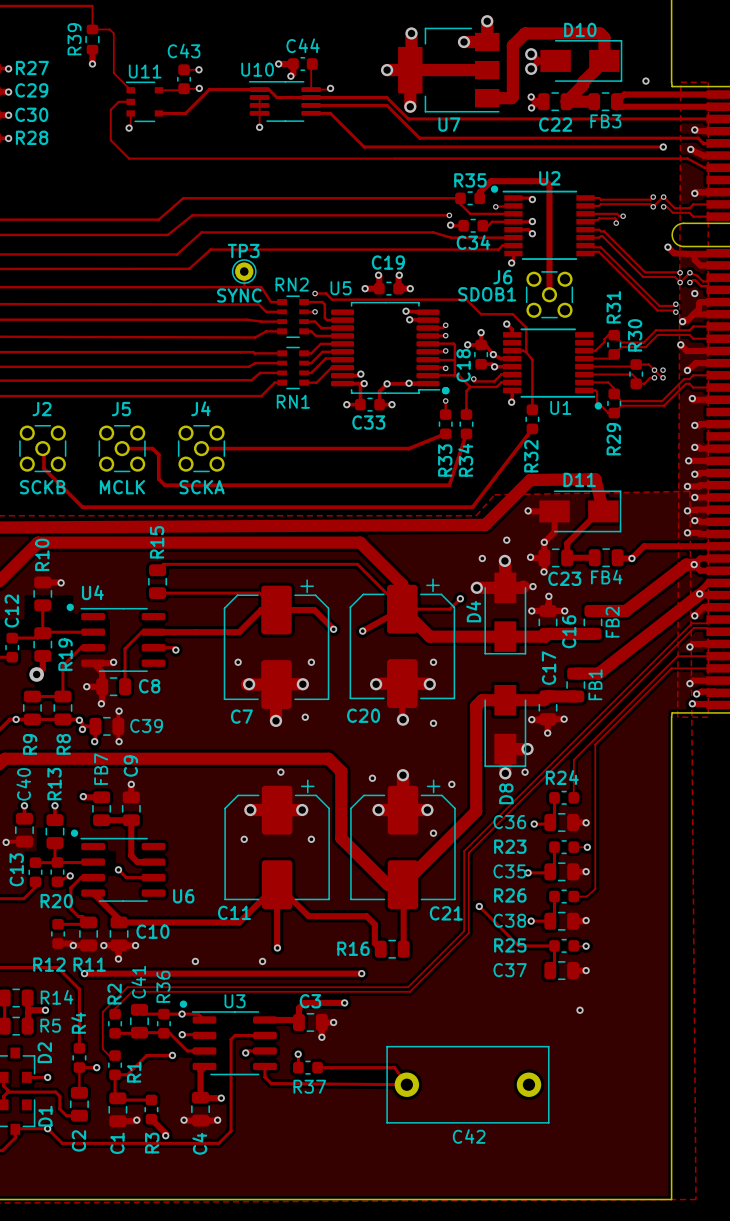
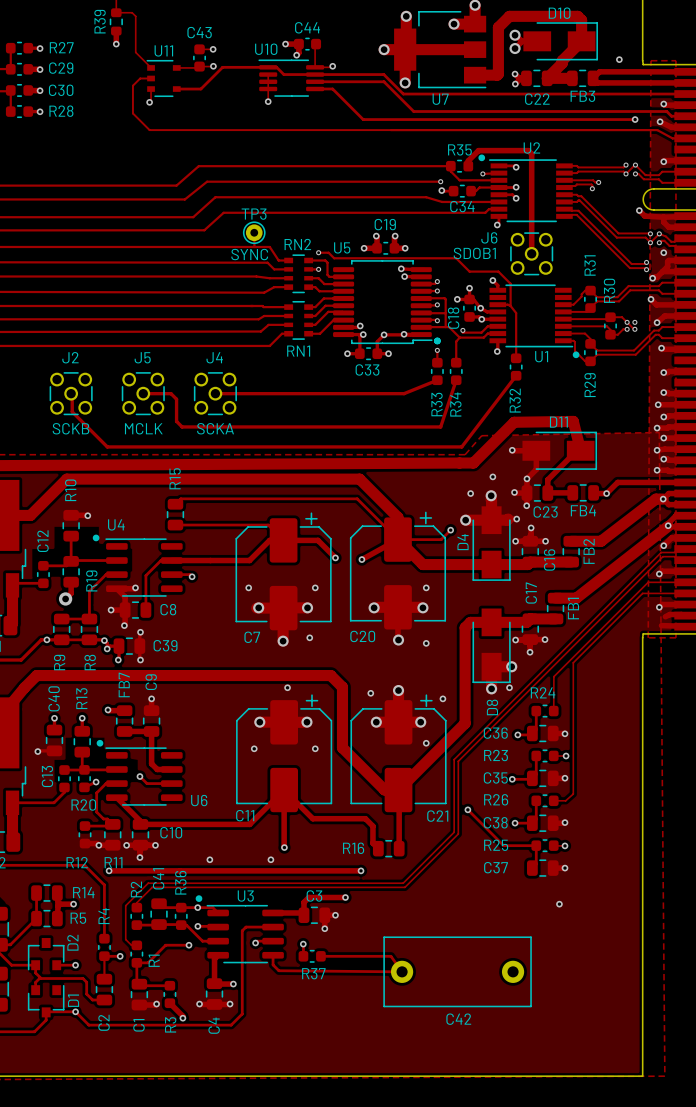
via: (696, 694) -> none
via: (692, 703) -> none

